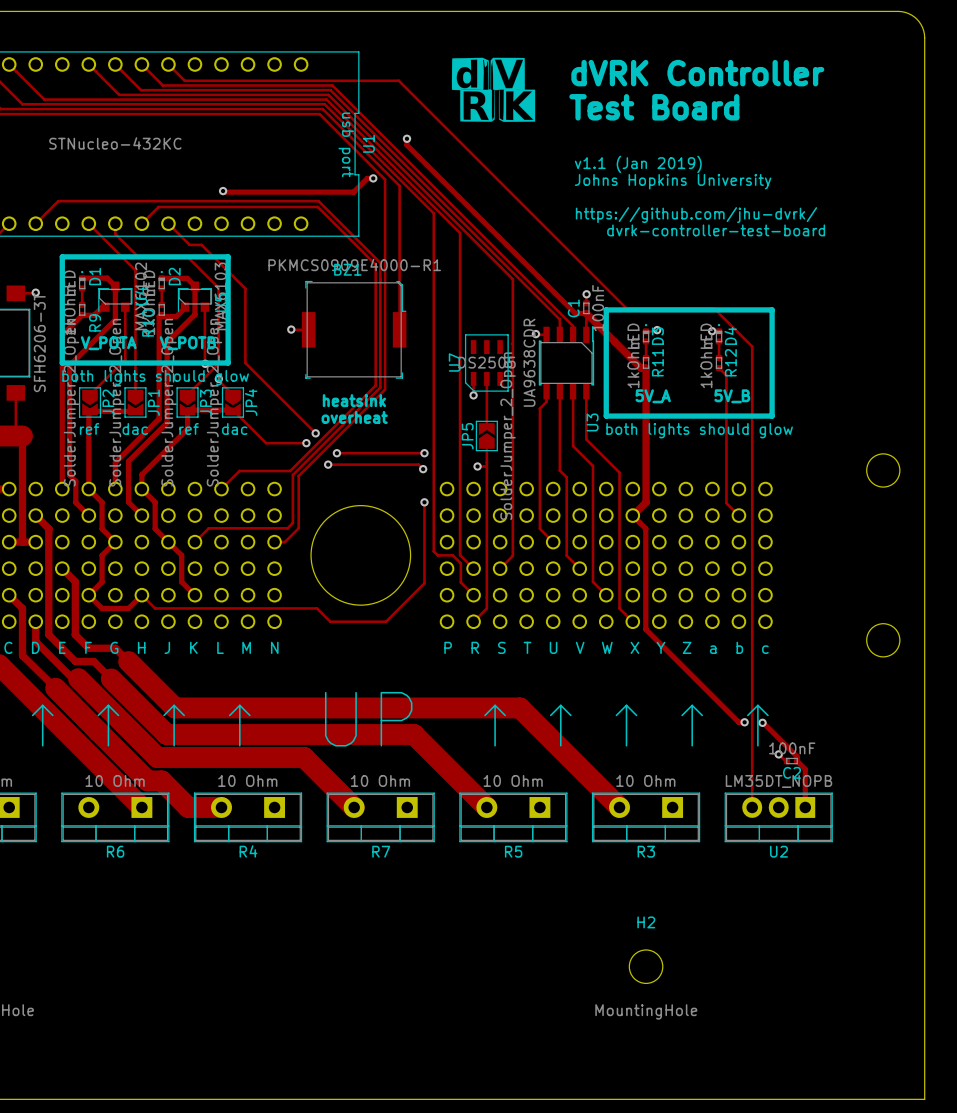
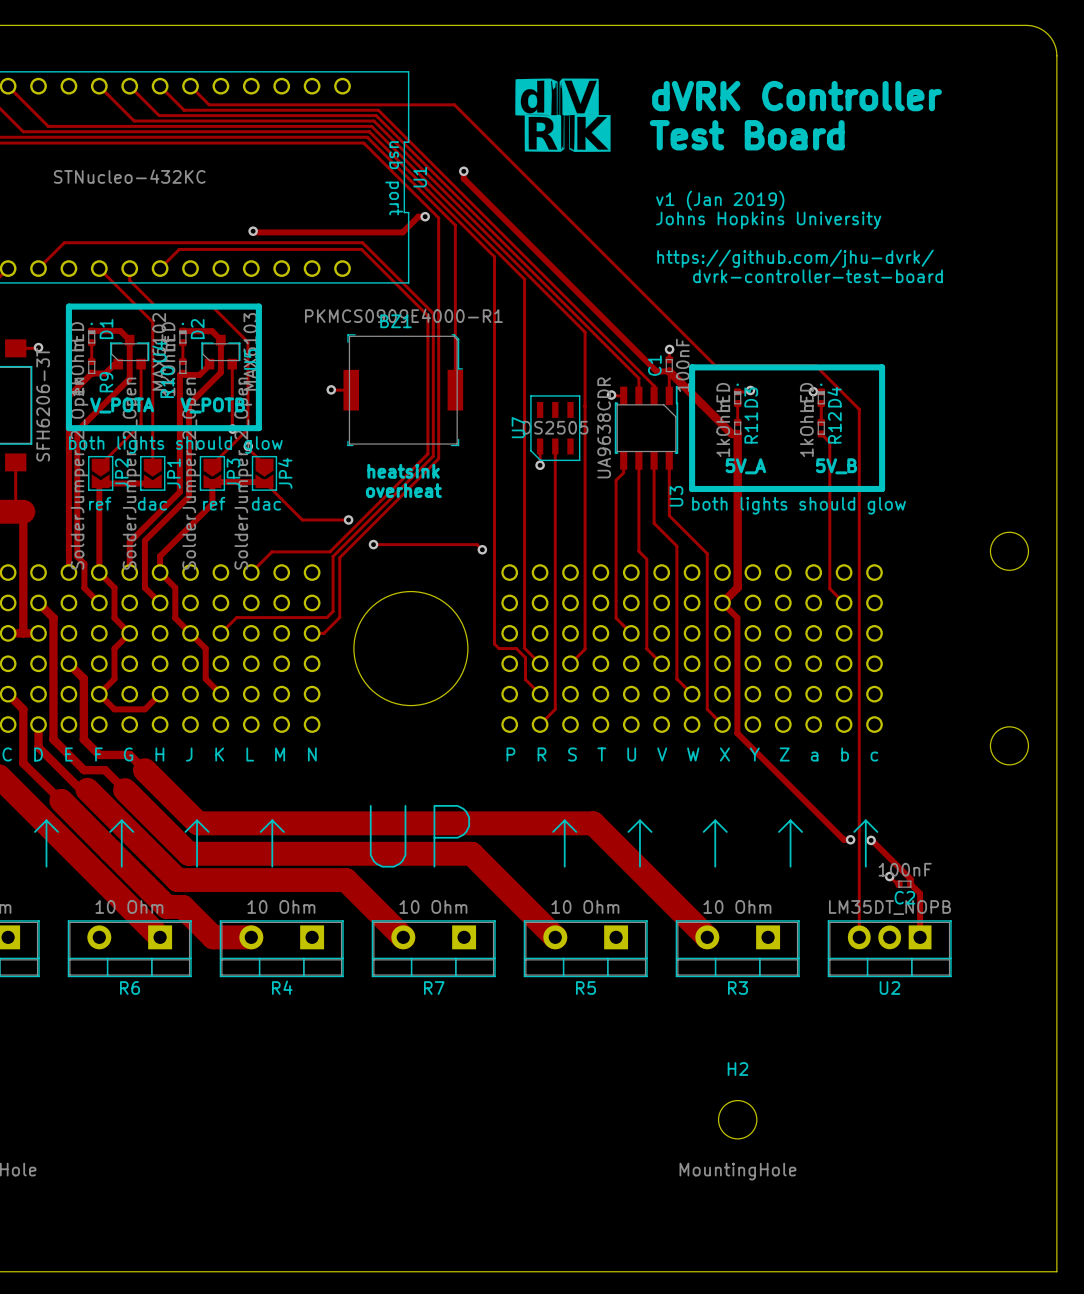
text: v1.1 (Jan 2019) (638, 164) -> v1 (Jan 2019) (720, 200)
track: (168, 223) (189, 244) (201, 244) (245, 288) (245, 363) (315, 433) -> none
track: none -> (555, 503) (555, 520)
via: (315, 433) -> none
JP5: SolderJumper_2_Open (486, 435) -> none
track: (336, 453) (424, 453) -> none
via: (336, 453) -> none
via: (424, 453) -> none
track: (477, 466) (486, 466) -> none
via: (477, 466) -> none
track: (424, 502) (424, 583) (386, 621) (330, 621) (317, 608) (155, 608) (141, 595) -> none
via: (424, 502) -> none

